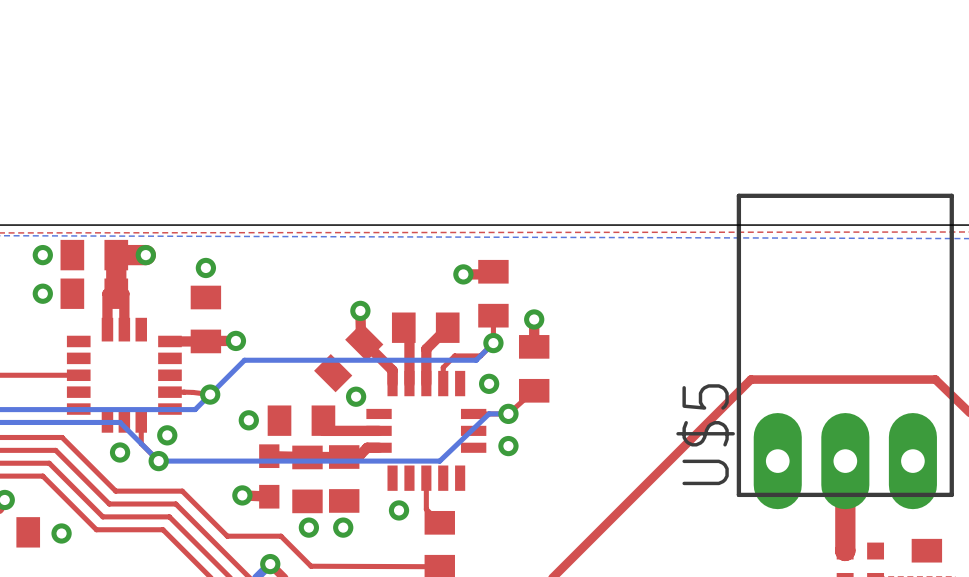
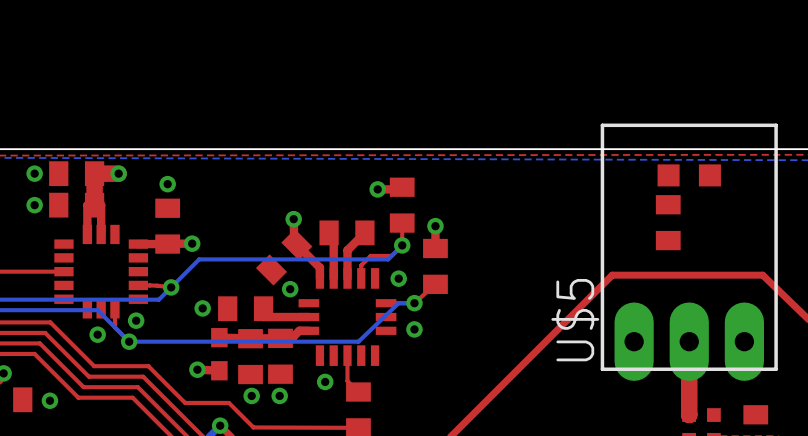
part: none -> (689, 175)
part: none -> (668, 222)

